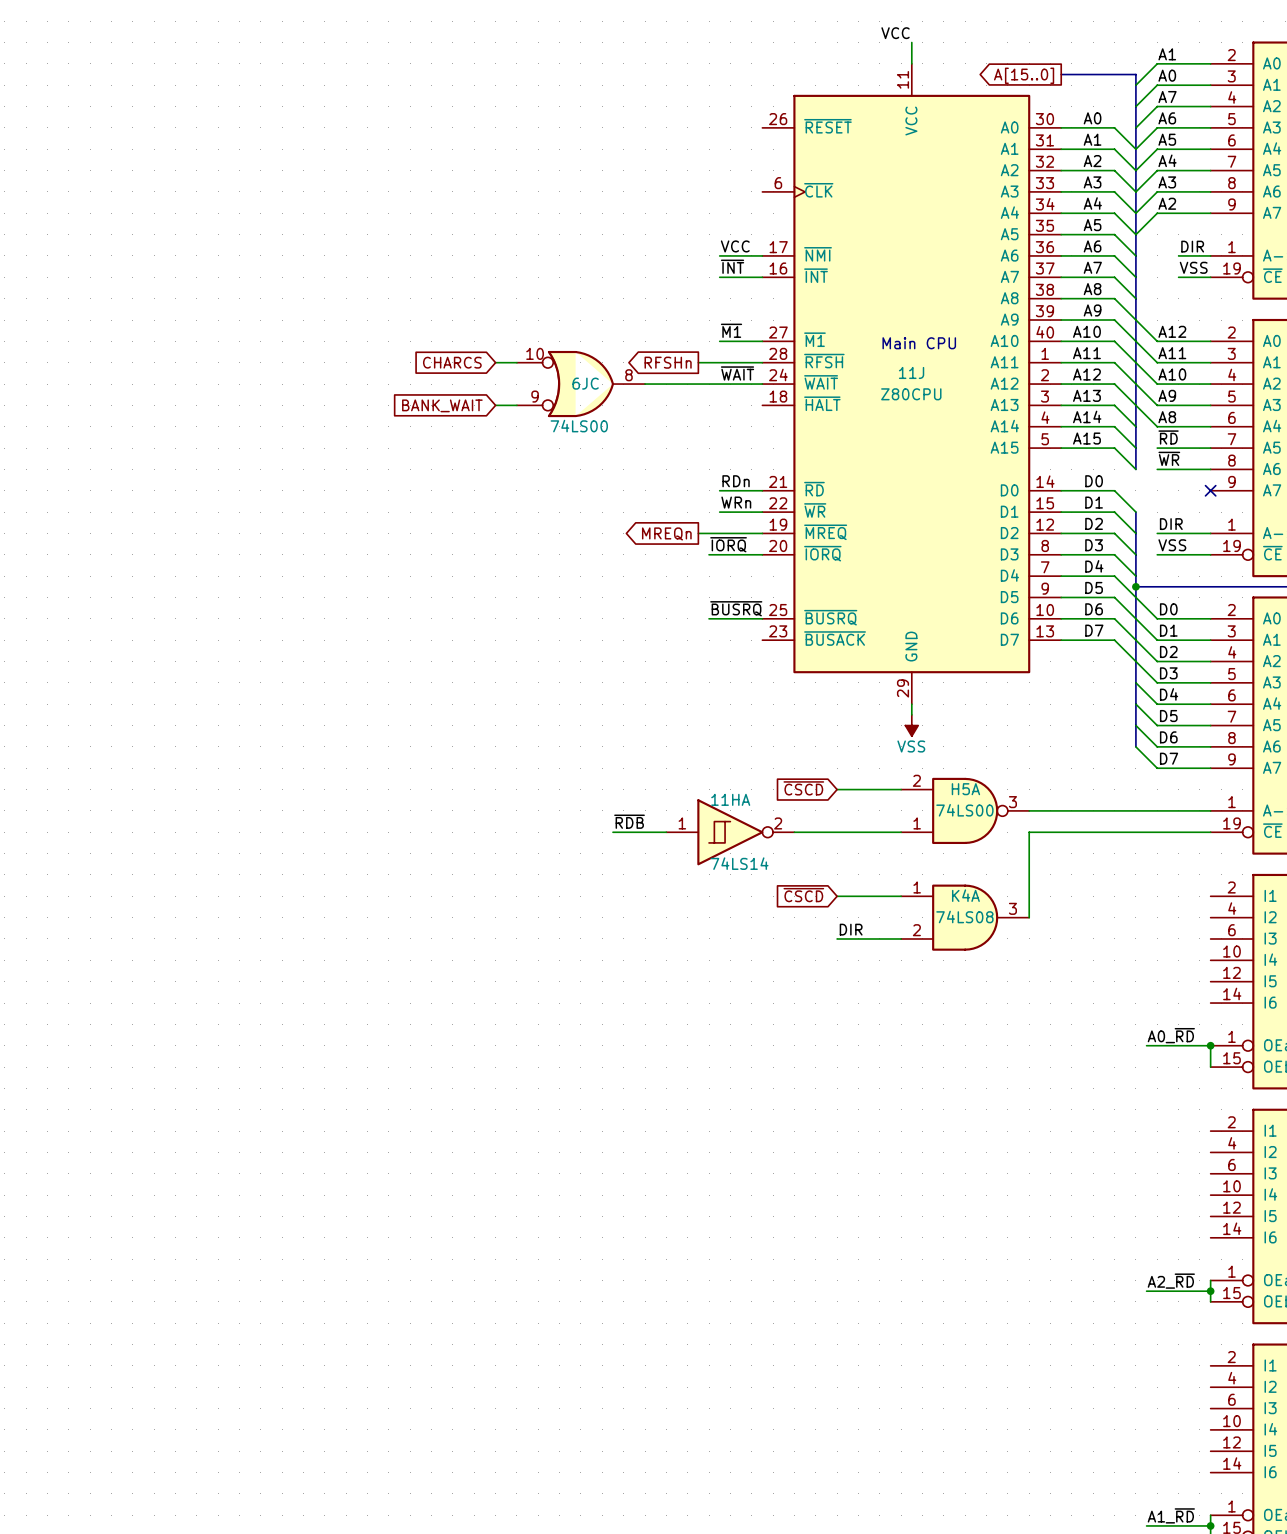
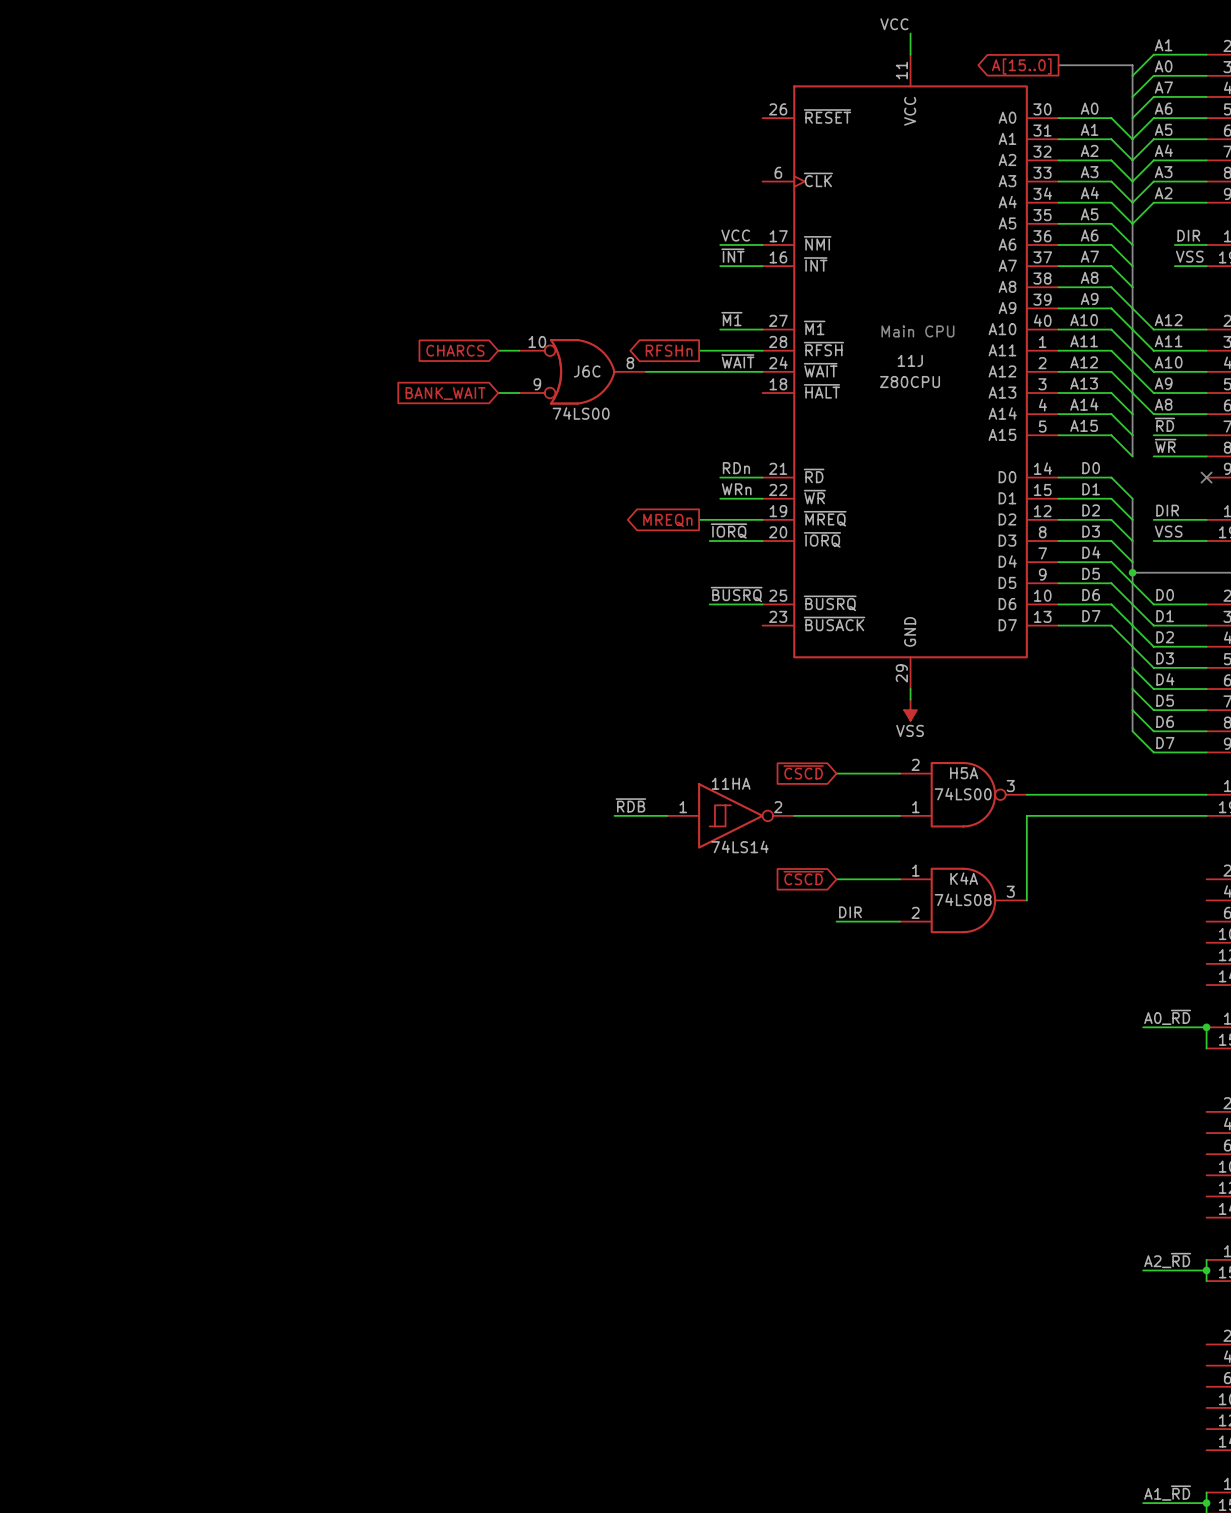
6JC name: 6JC (585, 383) -> J6C (587, 371)

